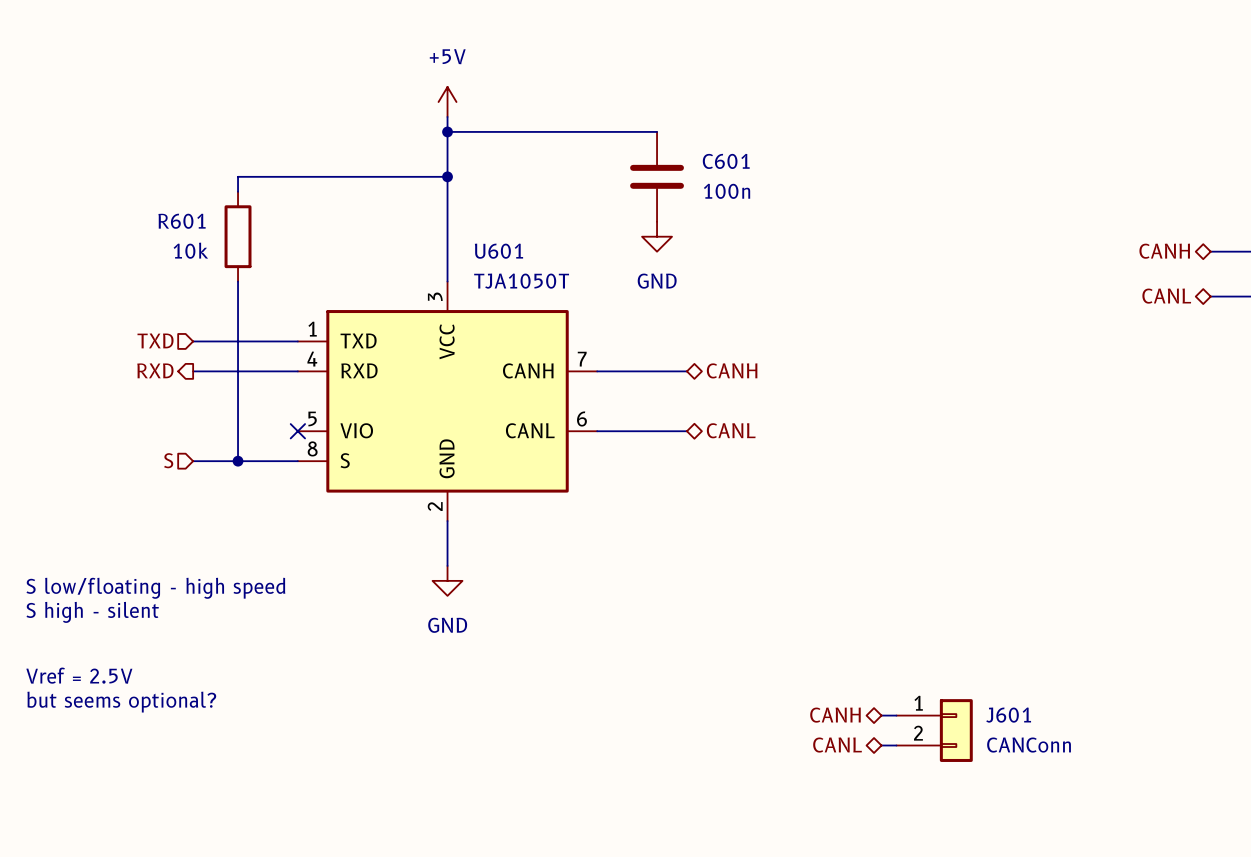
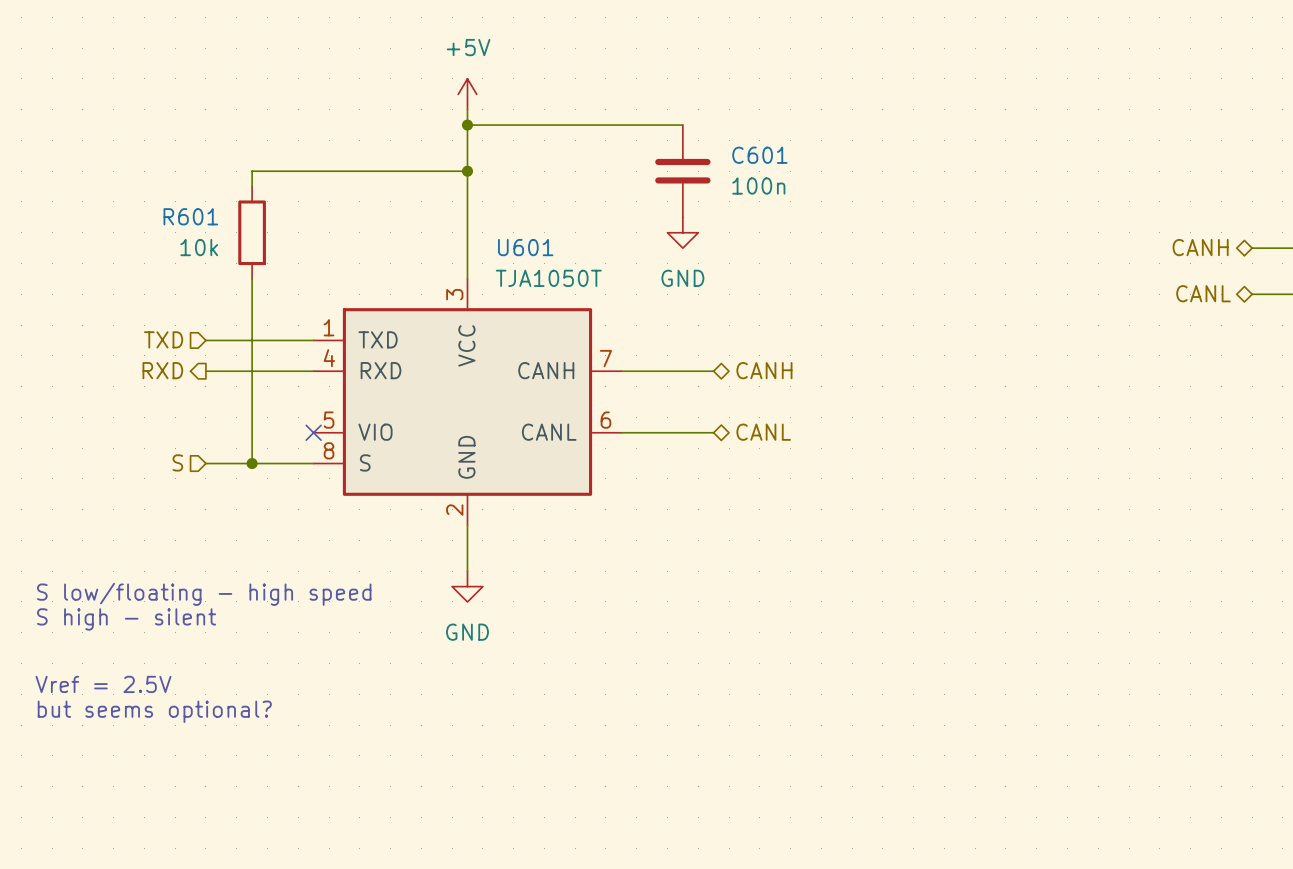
hierarchical label: CANH (835, 715) -> none
wire: (881, 715) (896, 715) -> none
J601: CANConn (934, 730) -> none
hierarchical label: CANL (837, 745) -> none
wire: (881, 745) (896, 745) -> none

